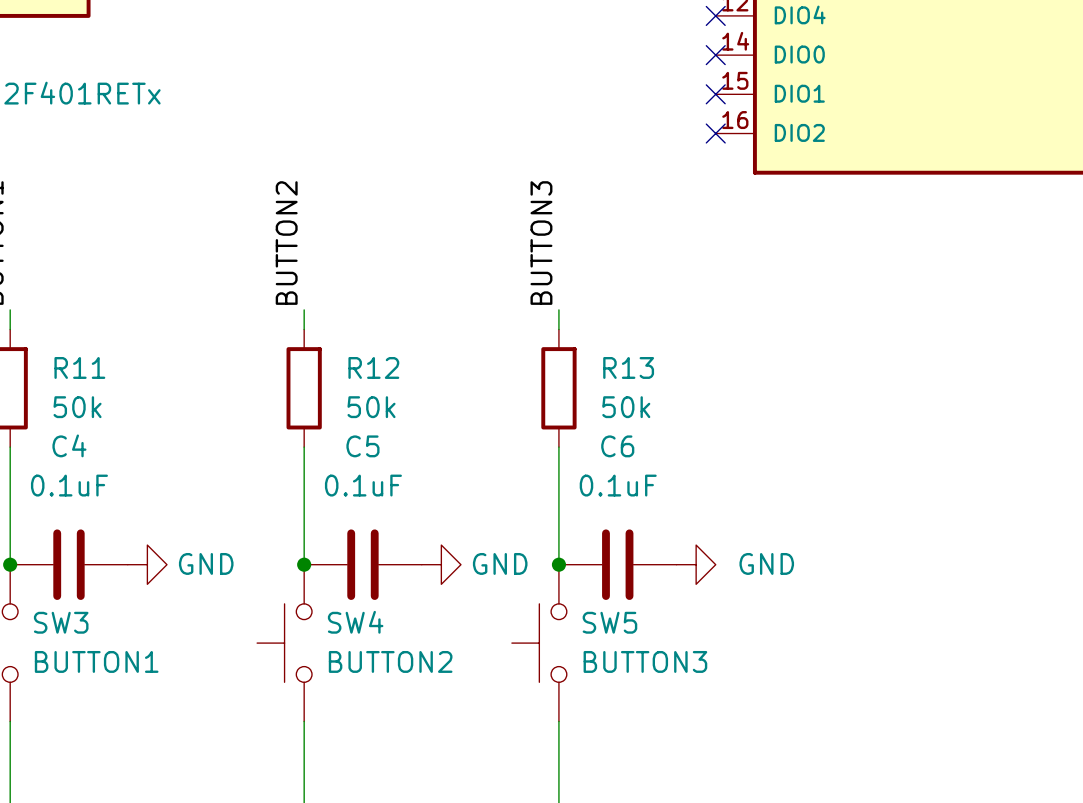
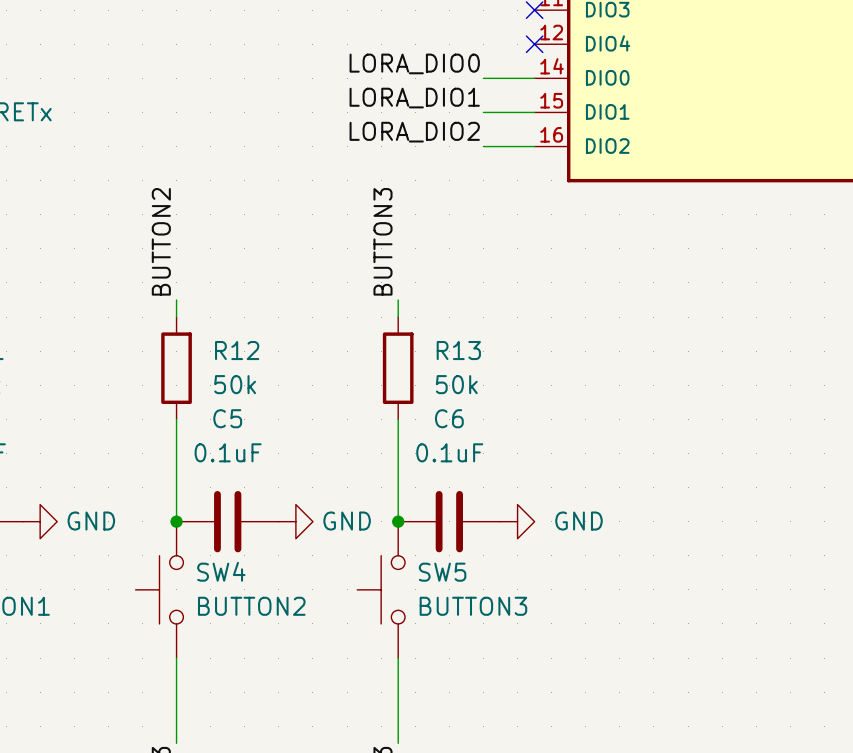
label: none -> LORA_DIO0 (414, 63)
wire: none -> (483, 78) (534, 78)
no-connect mark: (715, 55) -> none
label: none -> LORA_DIO1 (414, 98)
wire: none -> (483, 112) (534, 112)
no-connect mark: (715, 94) -> none
label: none -> LORA_DIO2 (414, 132)
wire: none -> (483, 146) (534, 146)
no-connect mark: (715, 133) -> none

